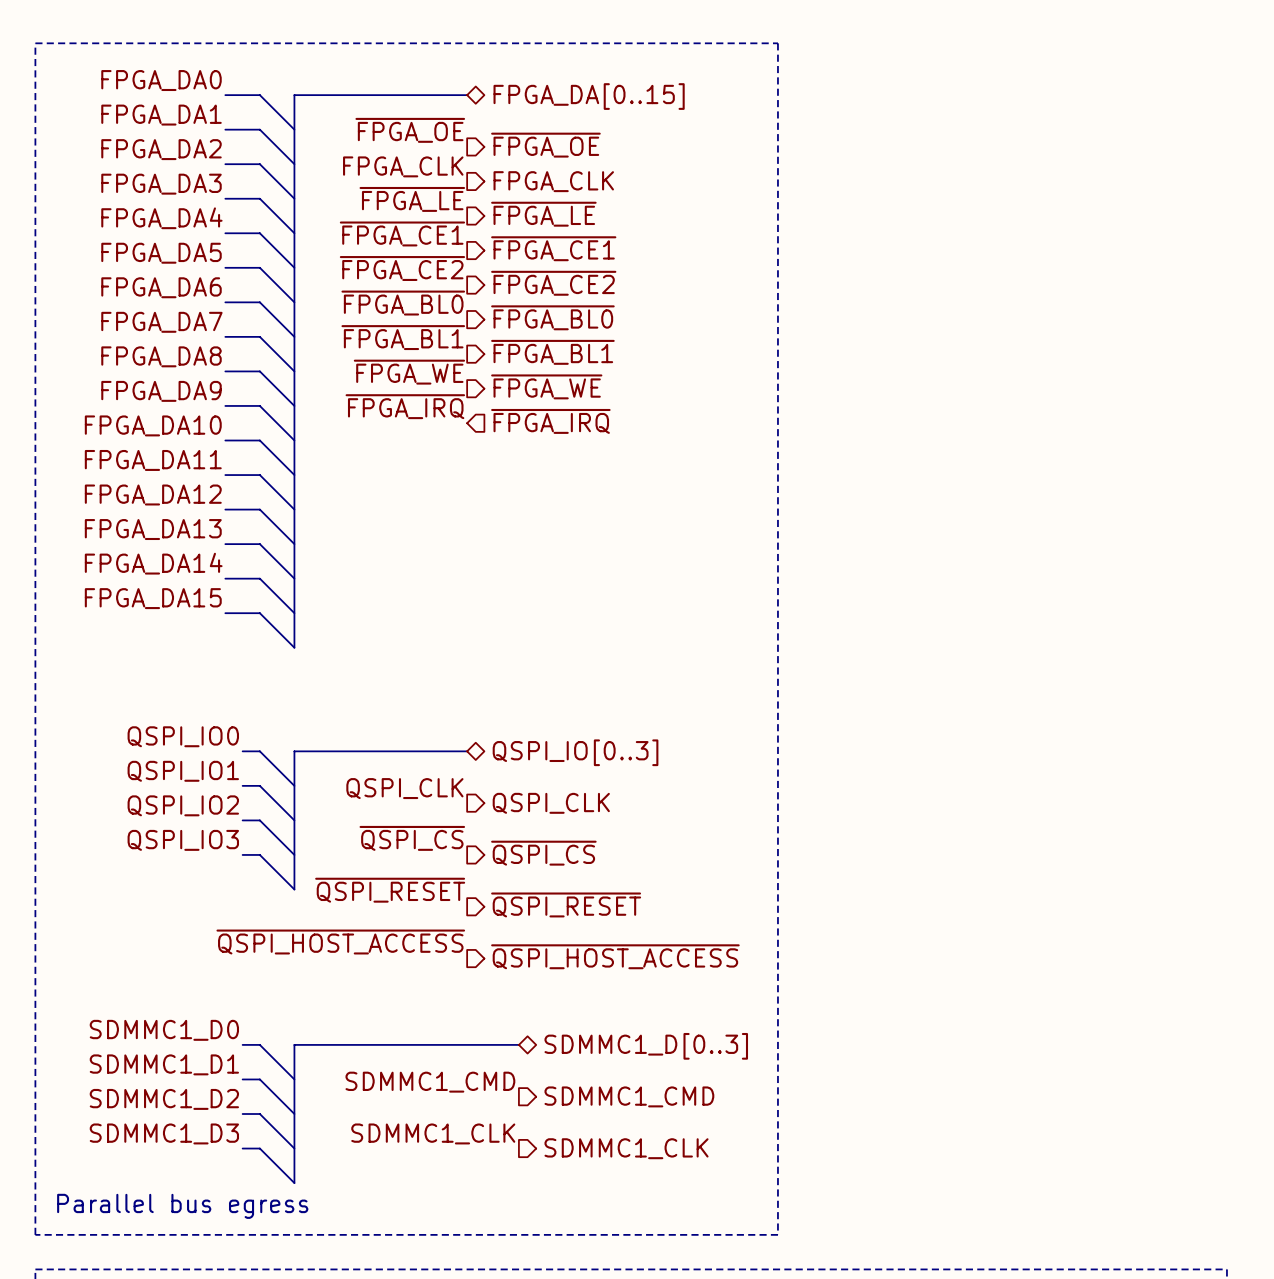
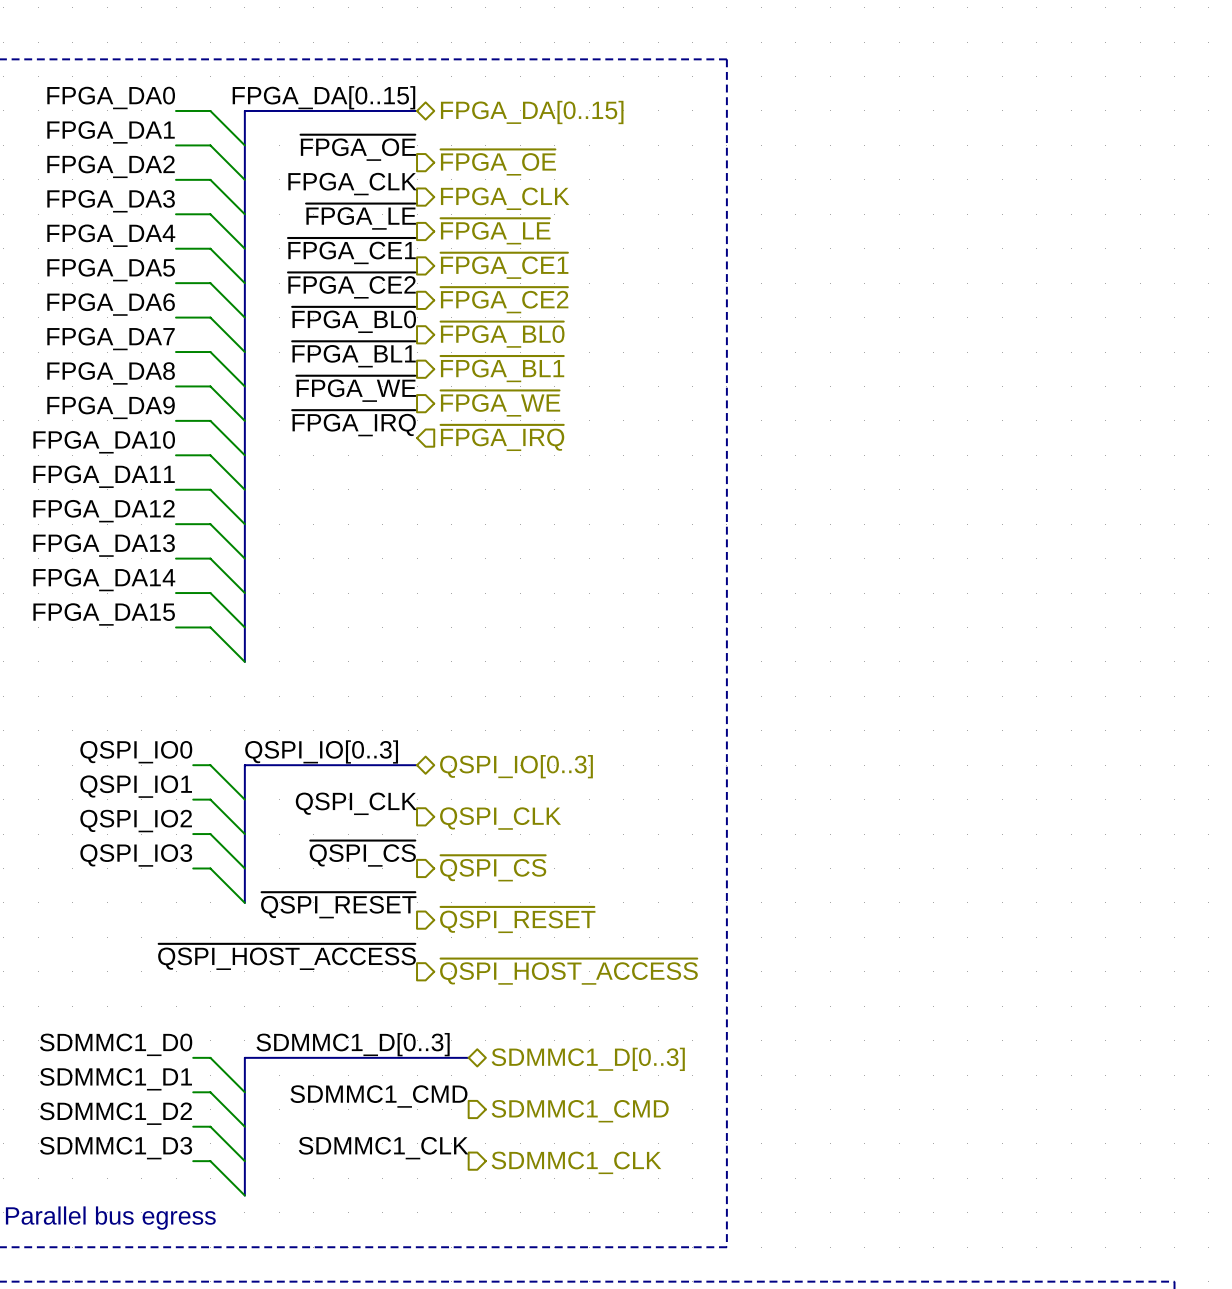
label: none -> FPGA_DA[0..15] (323, 97)
label: none -> QSPI_IO[0..3] (321, 751)
label: none -> SDMMC1_D[0..3] (353, 1044)

